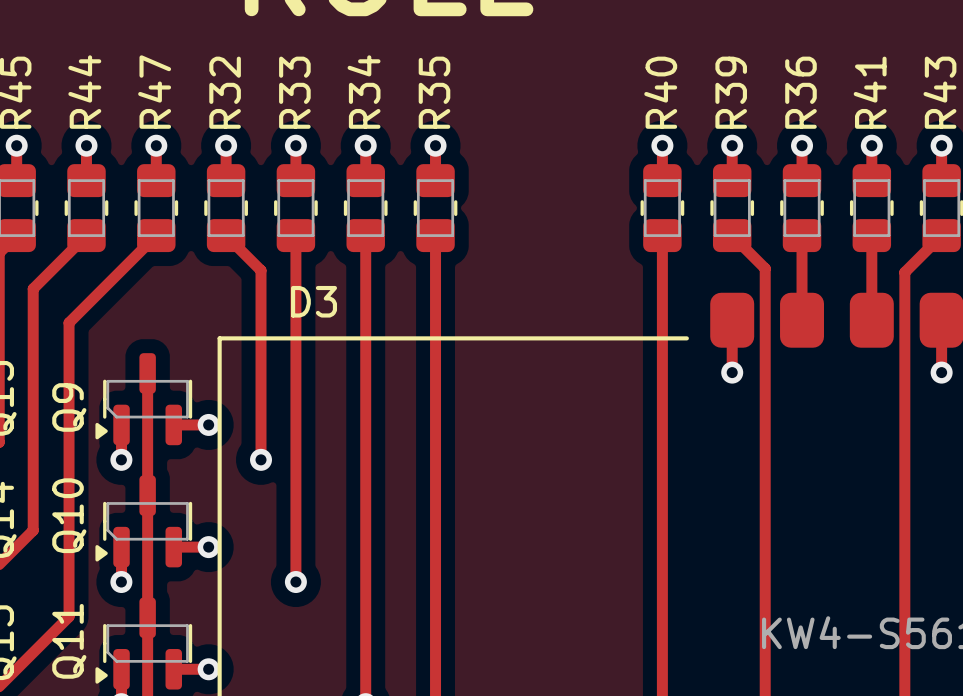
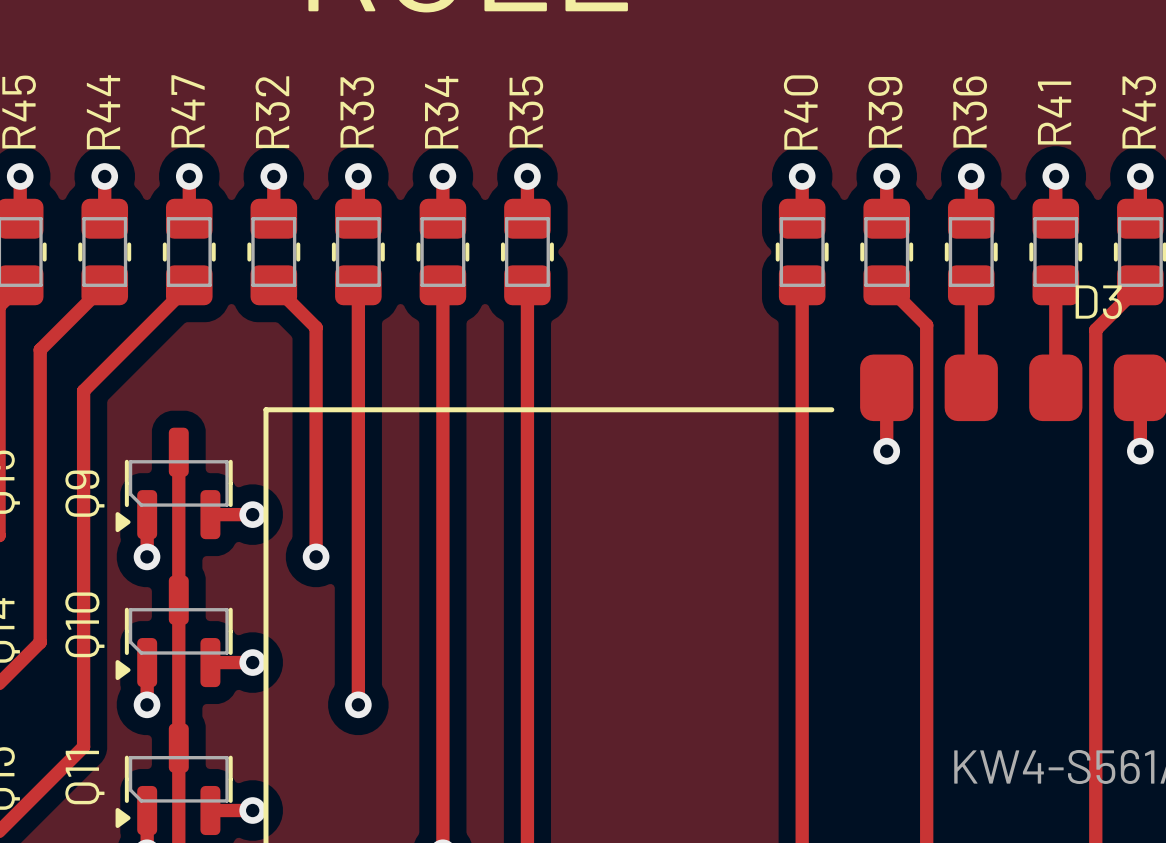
D3 name position: D3 (314, 301) -> D3 (1098, 302)

